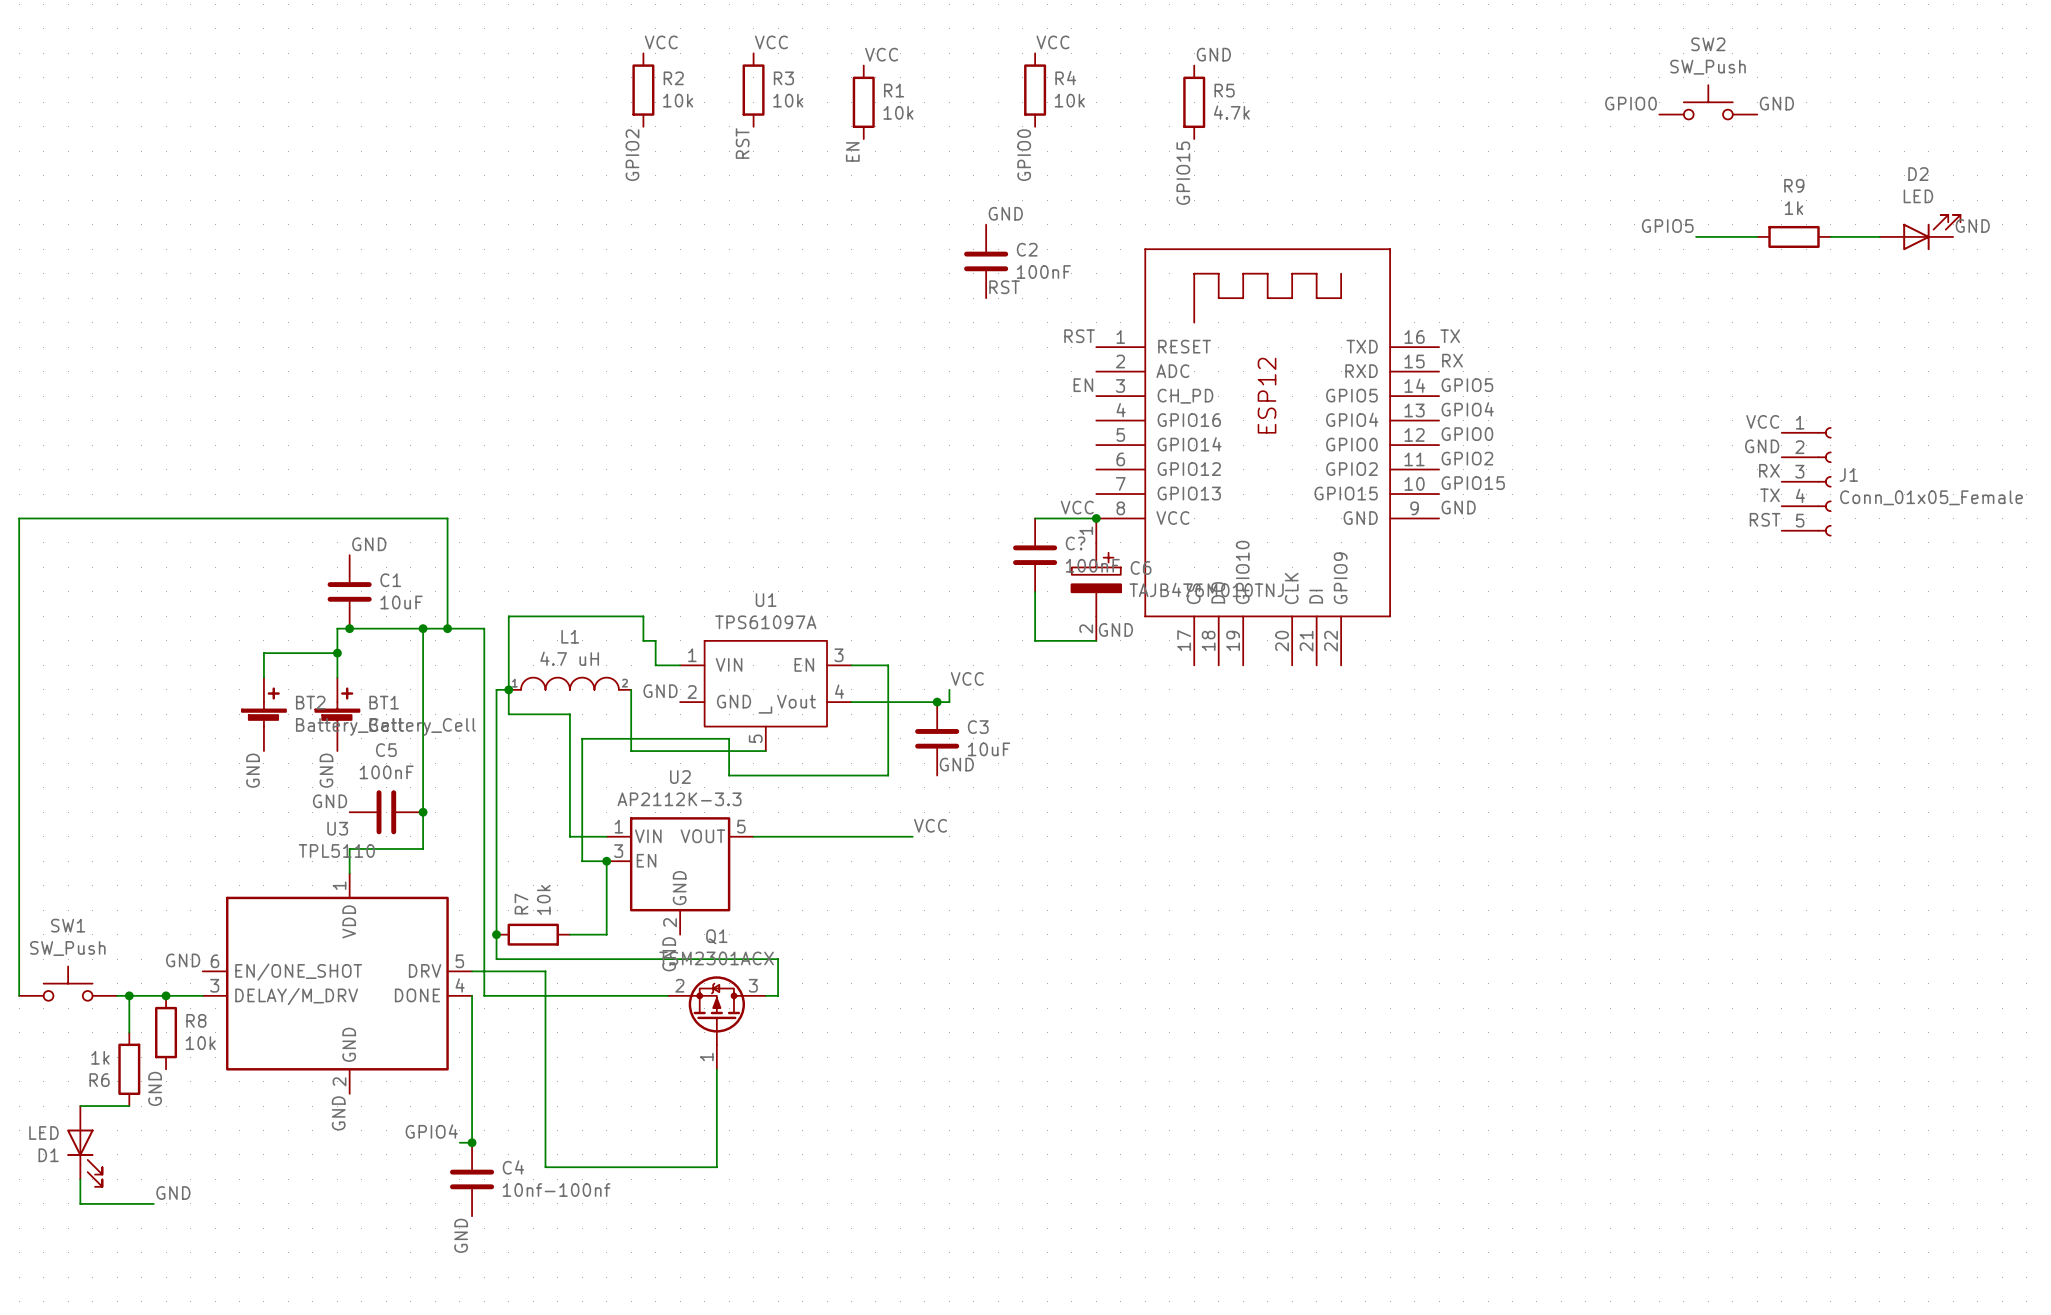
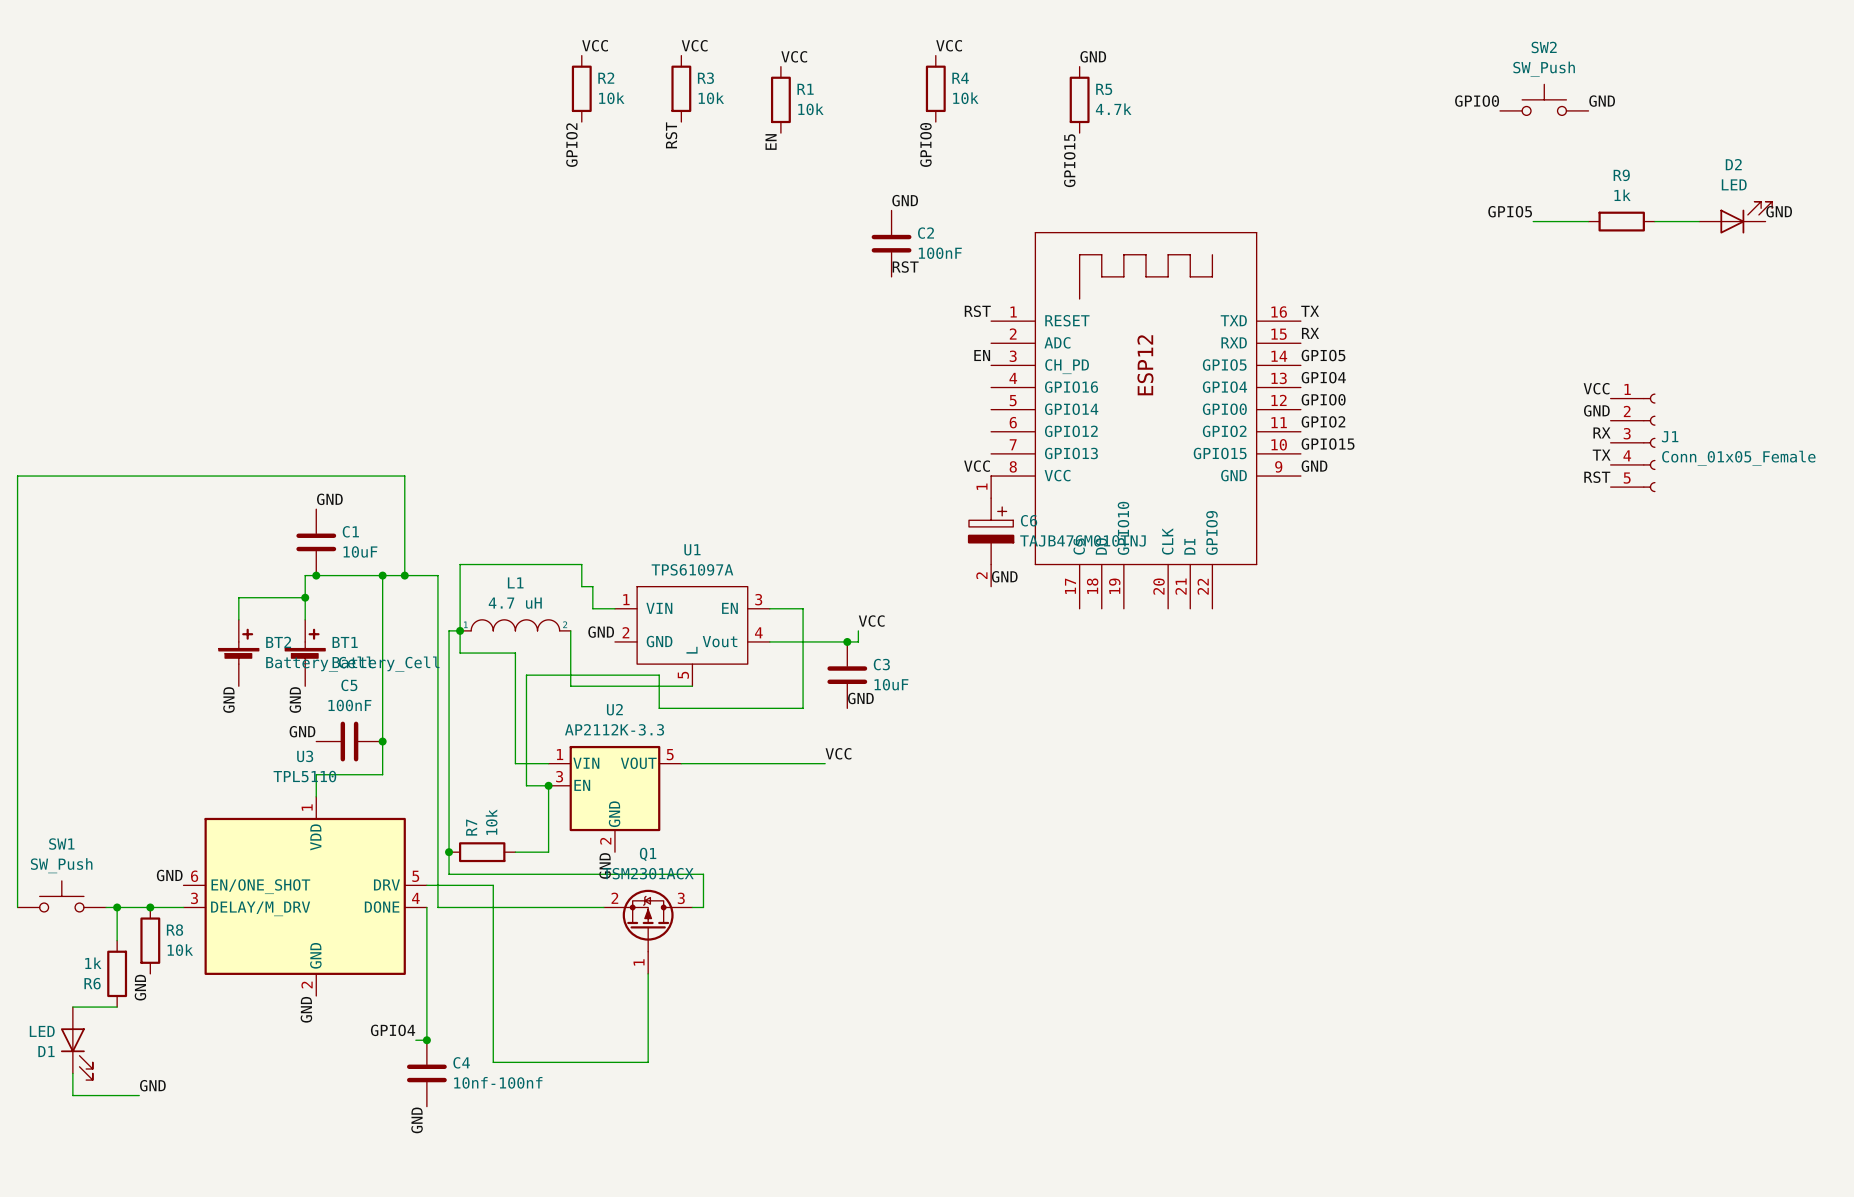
wire: (1035, 518) (1096, 518) -> none
junction: (1096, 518) -> none
C?: 100nF (1035, 555) -> none
wire: (1035, 591) (1035, 640) (1096, 640) -> none

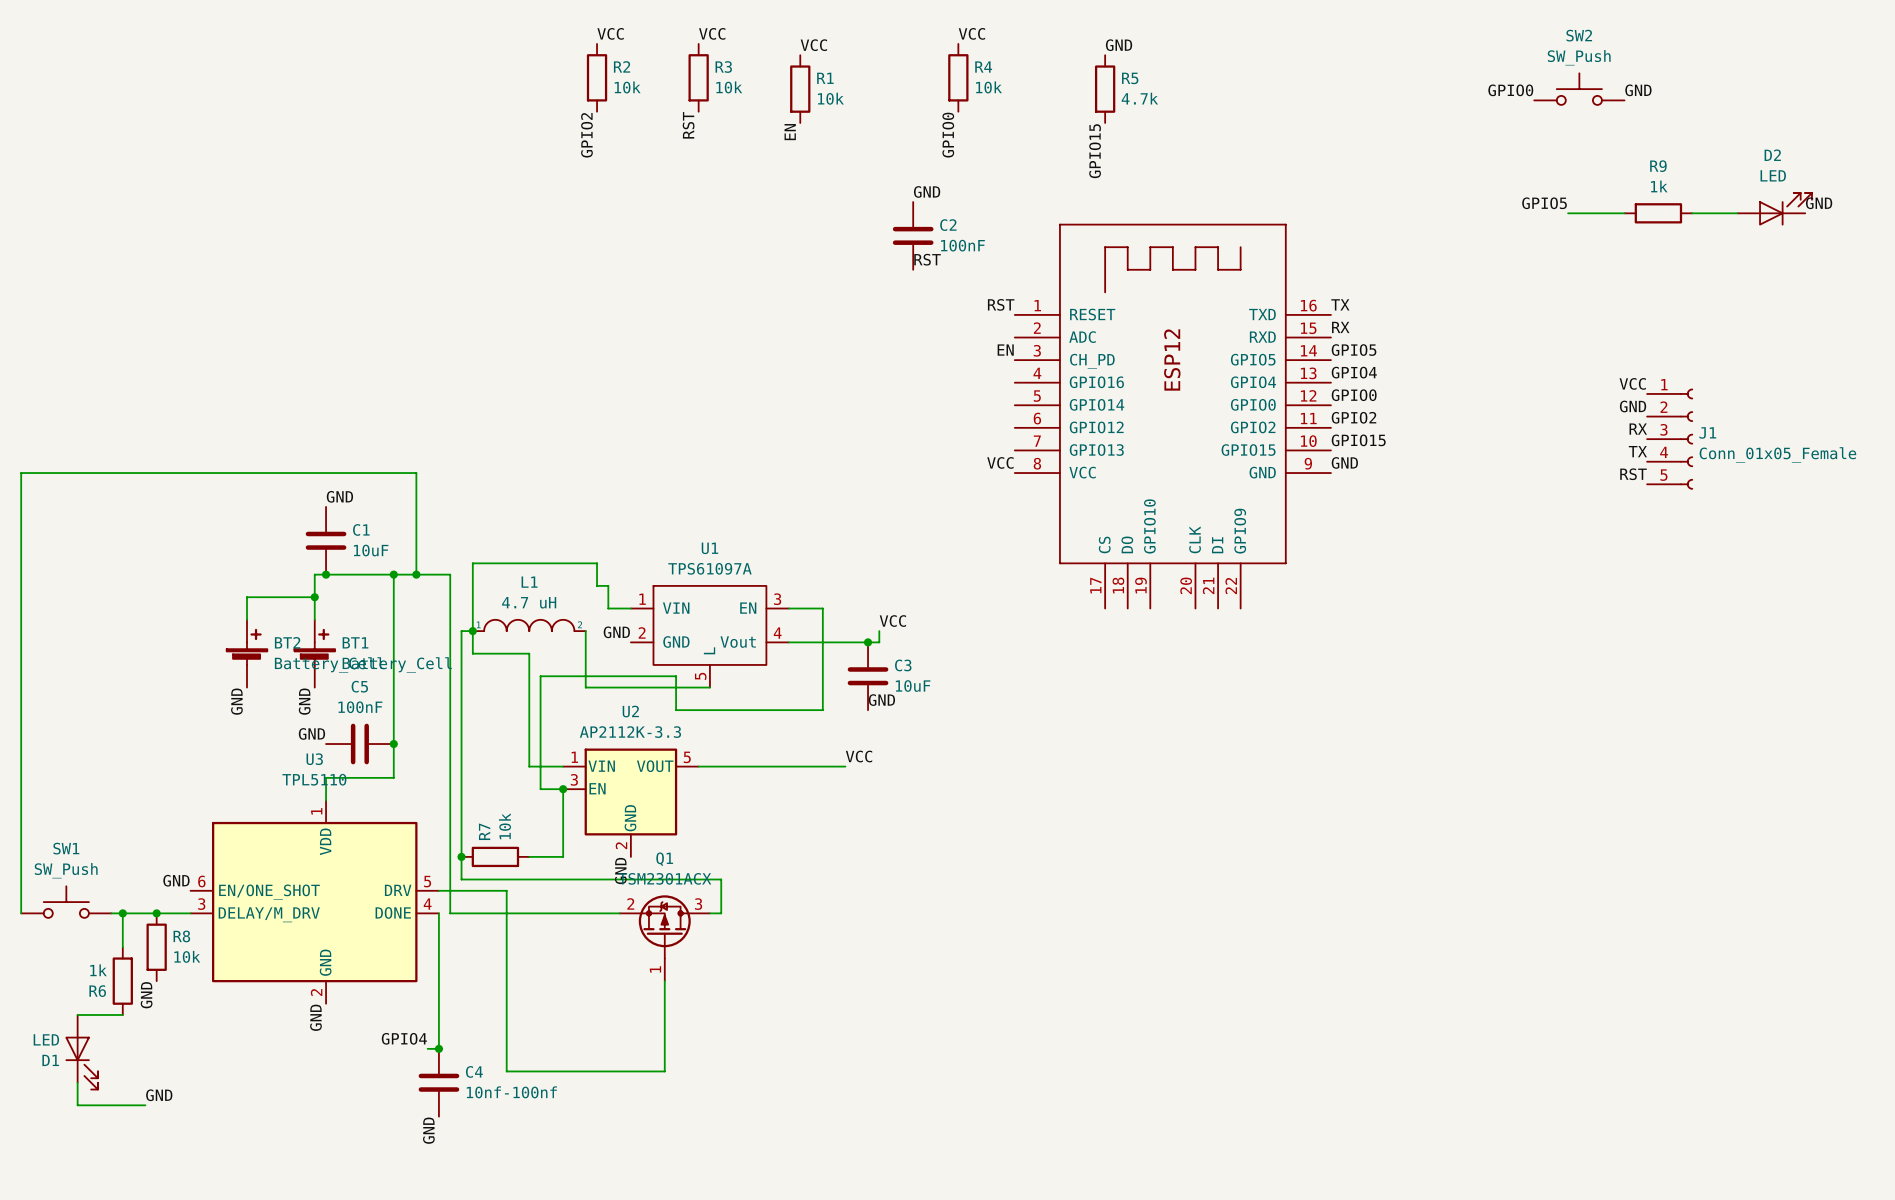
C6: TAJB476M010TNJ (991, 531) -> none
label: GND (1004, 576) -> none

